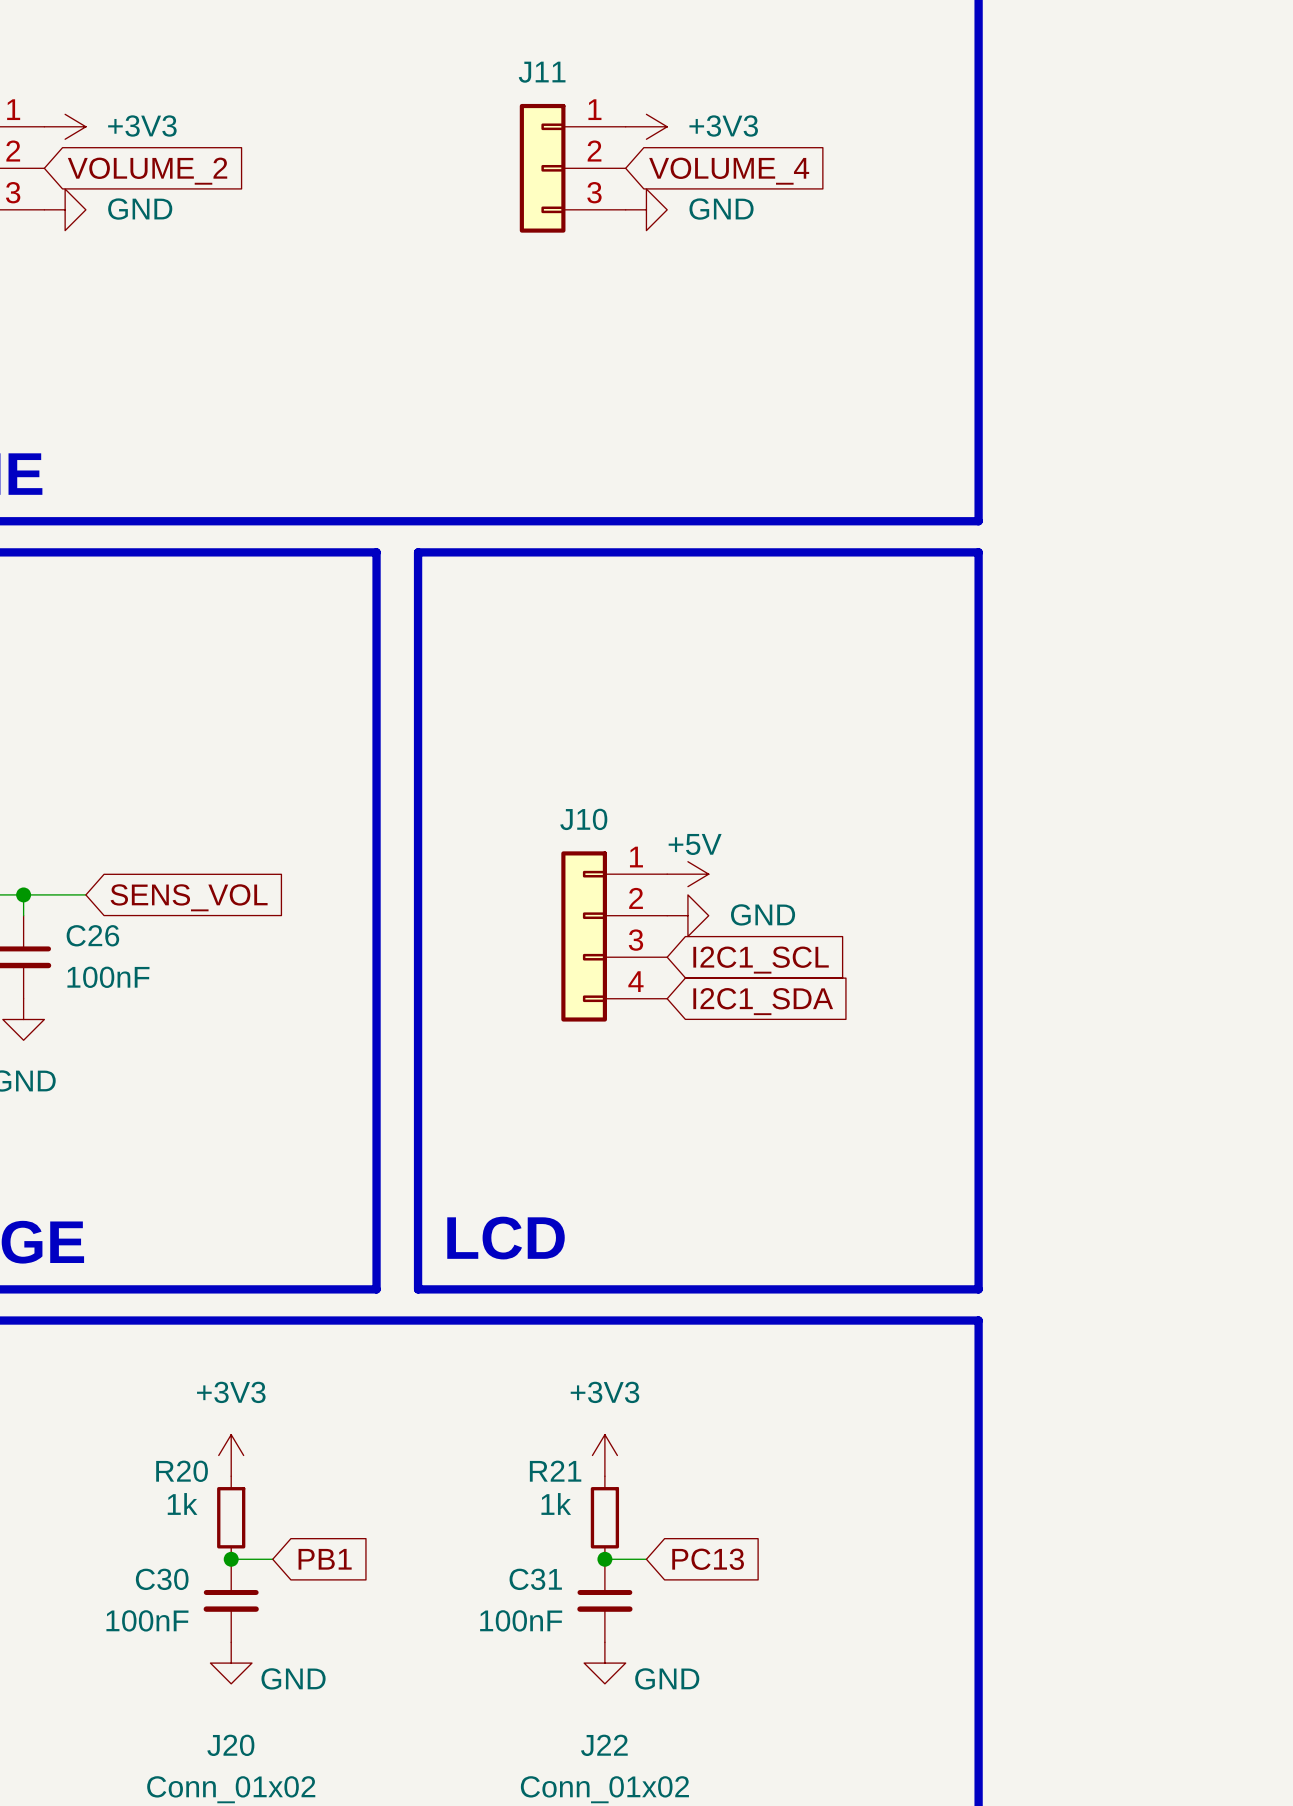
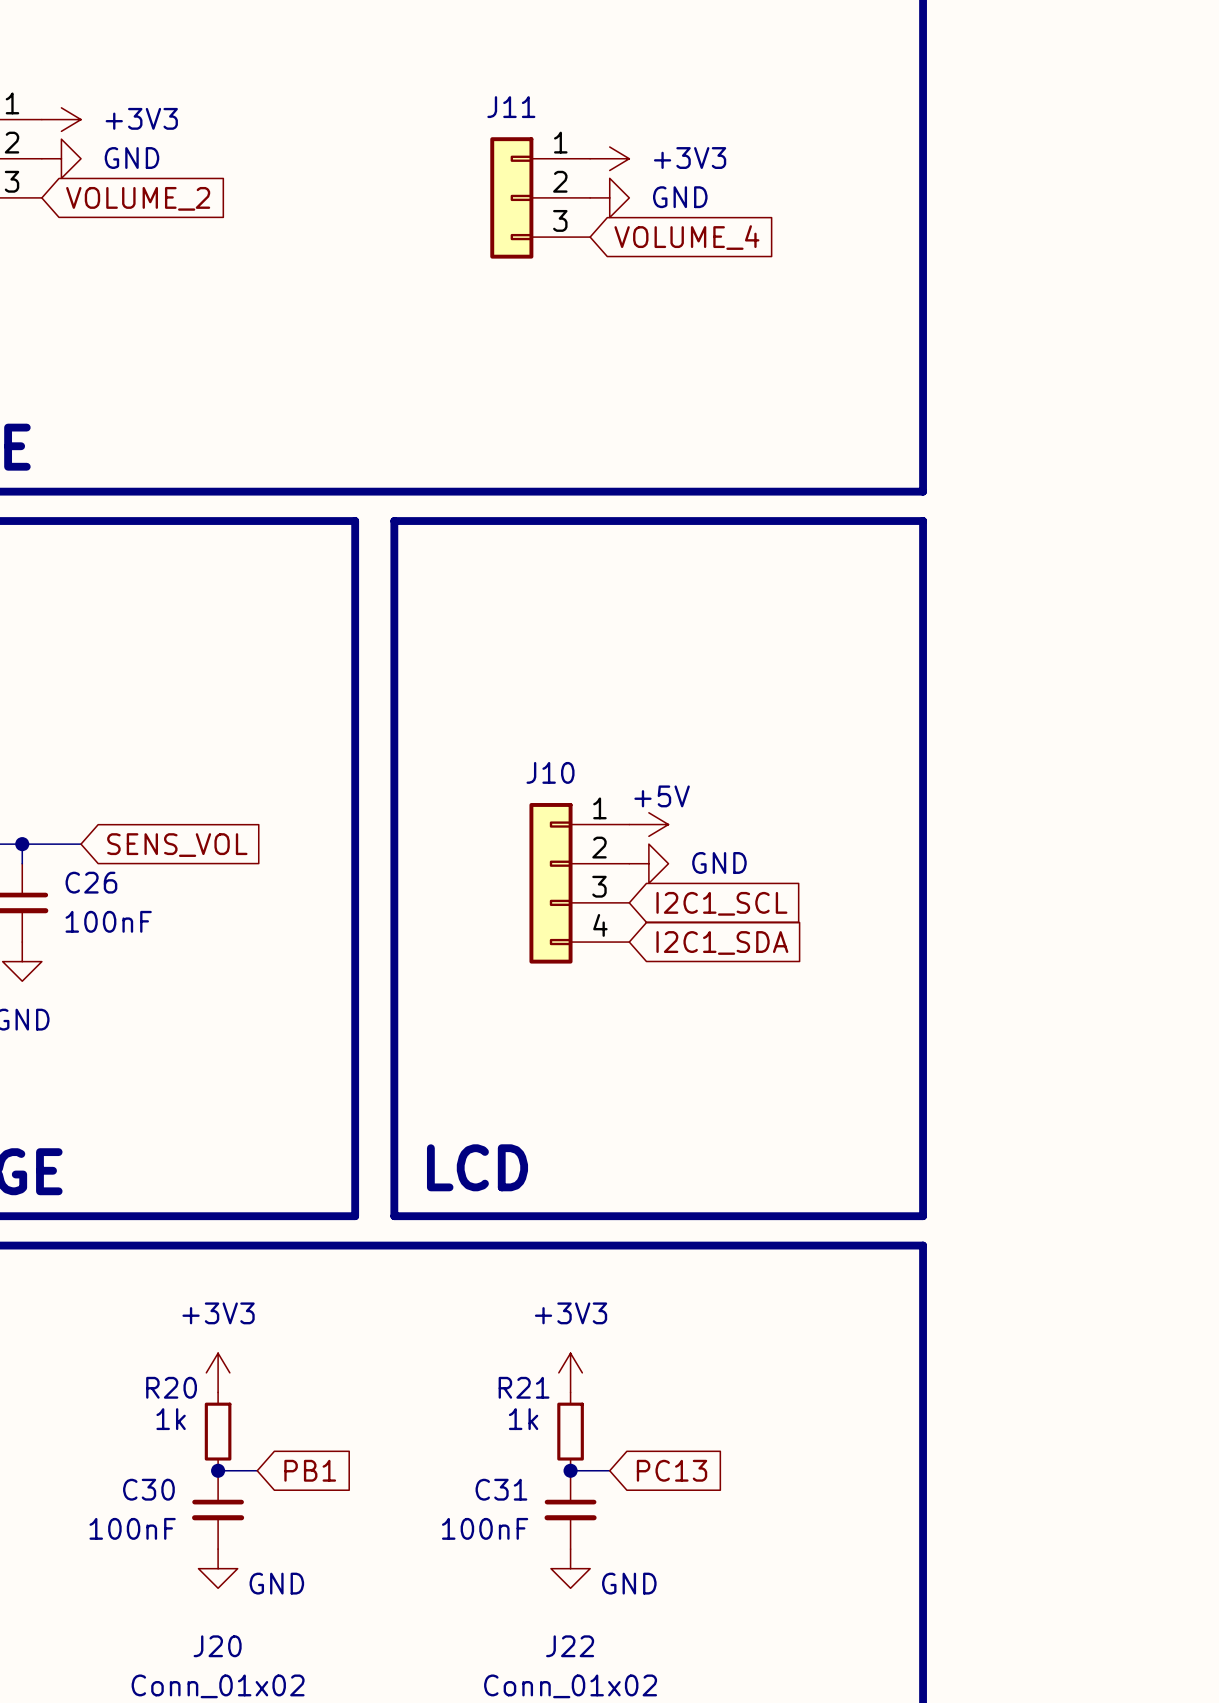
power symbol position: +3V3 (646, 126) -> +3V3 (609, 158)
J11 position: (572, 168) -> (540, 197)
global label position: VOLUME_2 (147, 171) -> VOLUME_2 (138, 198)
global label position: VOLUME_4 (729, 171) -> VOLUME_4 (686, 237)
power symbol position: GND (65, 209) -> GND (61, 158)

